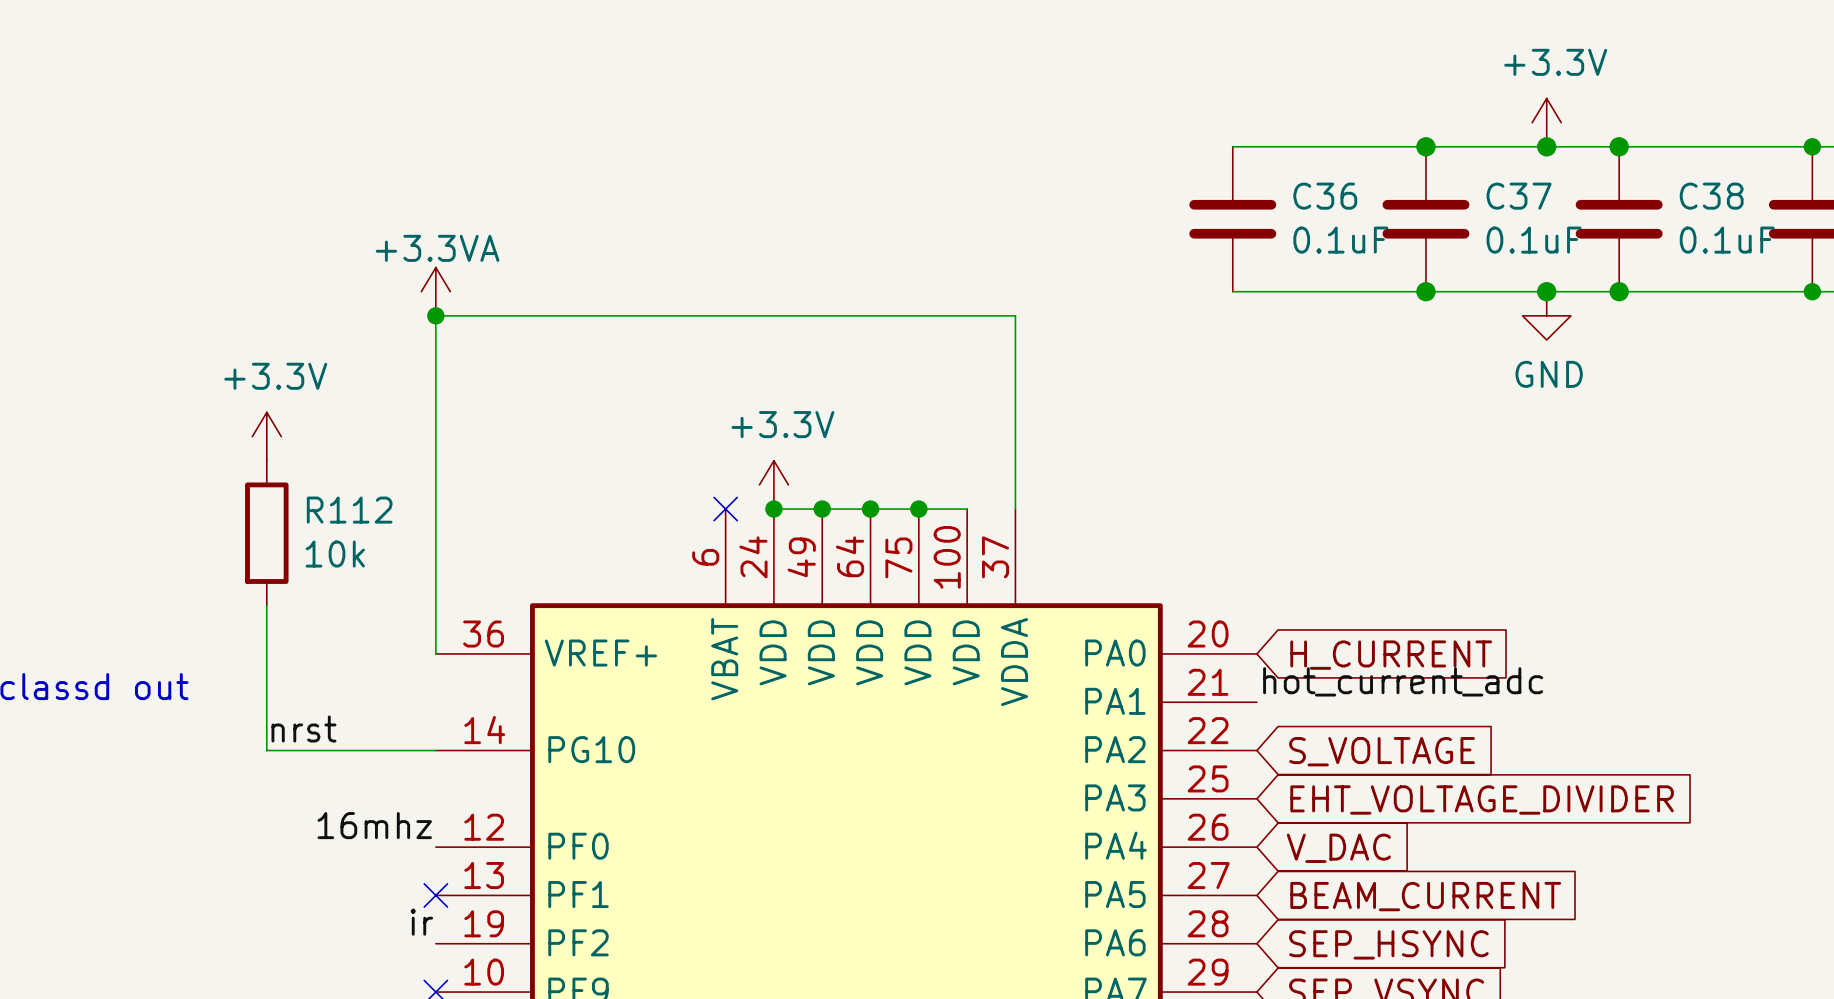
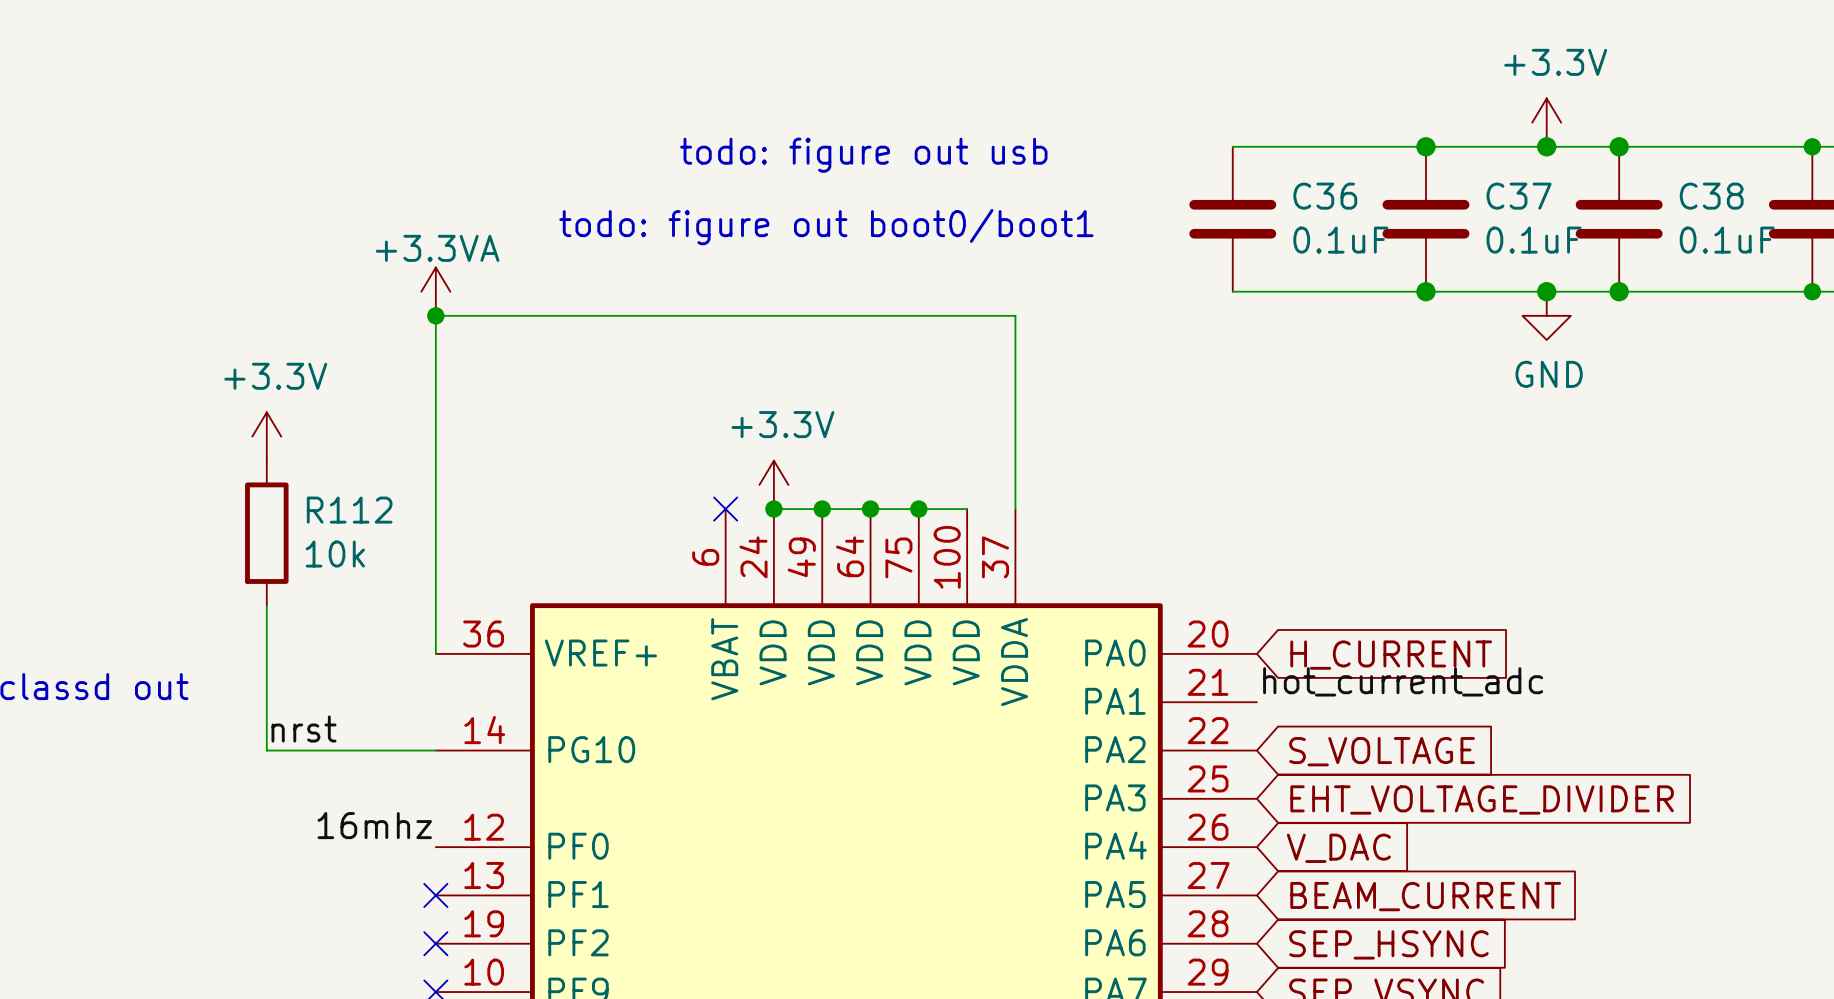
text: none -> todo: figure out usb (863, 155)
text: none -> todo: figure out boot0/boot1 (826, 227)
label: ir (421, 922) -> none
no-connect mark: none -> (435, 943)

